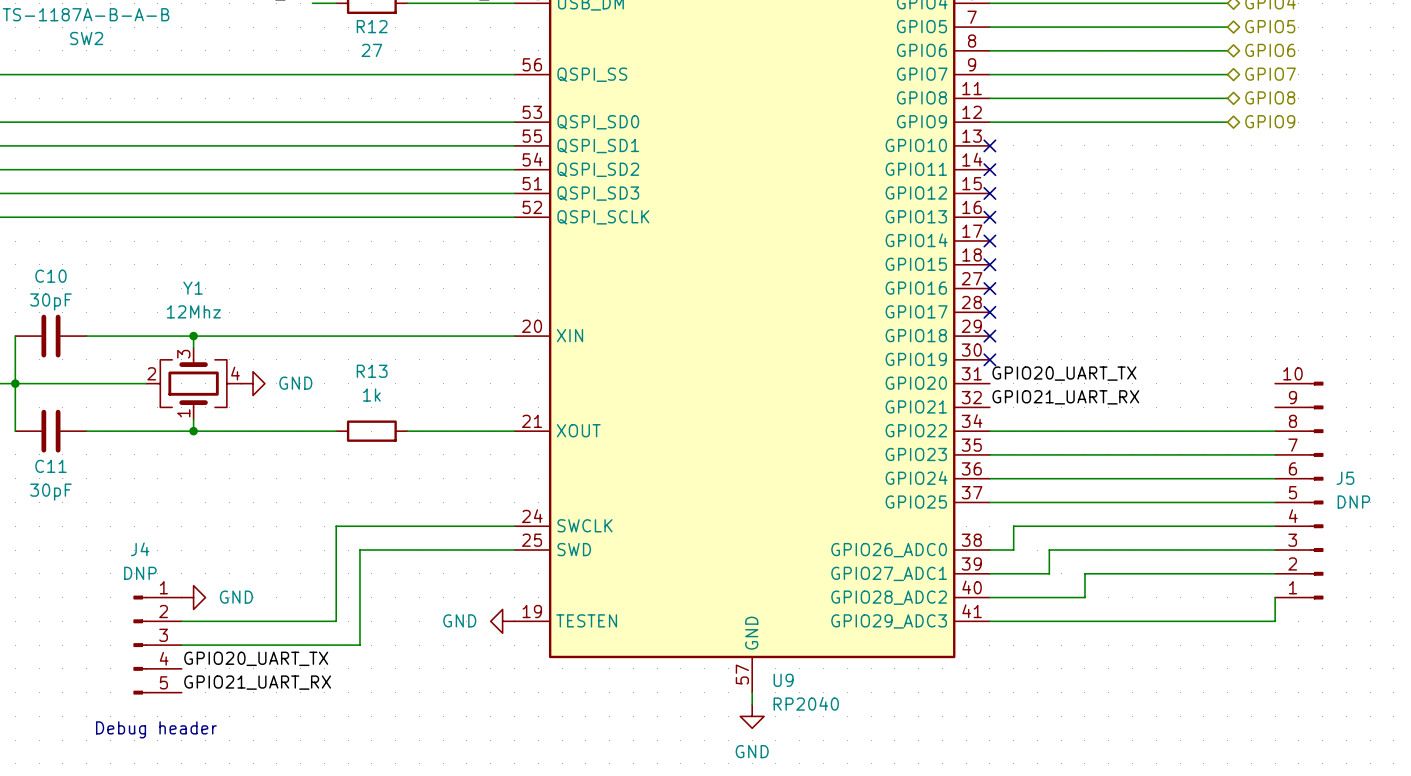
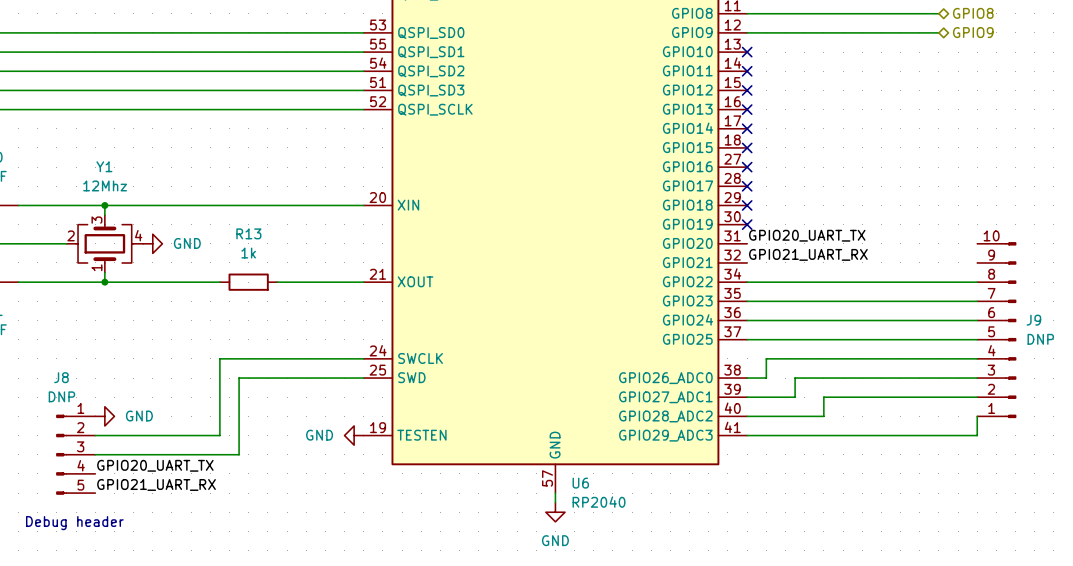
J5 name: J5 (1345, 478) -> J9 (1033, 320)
J4 name: J4 (140, 549) -> J8 (61, 377)
U9 name: U9 (783, 680) -> U6 (580, 483)

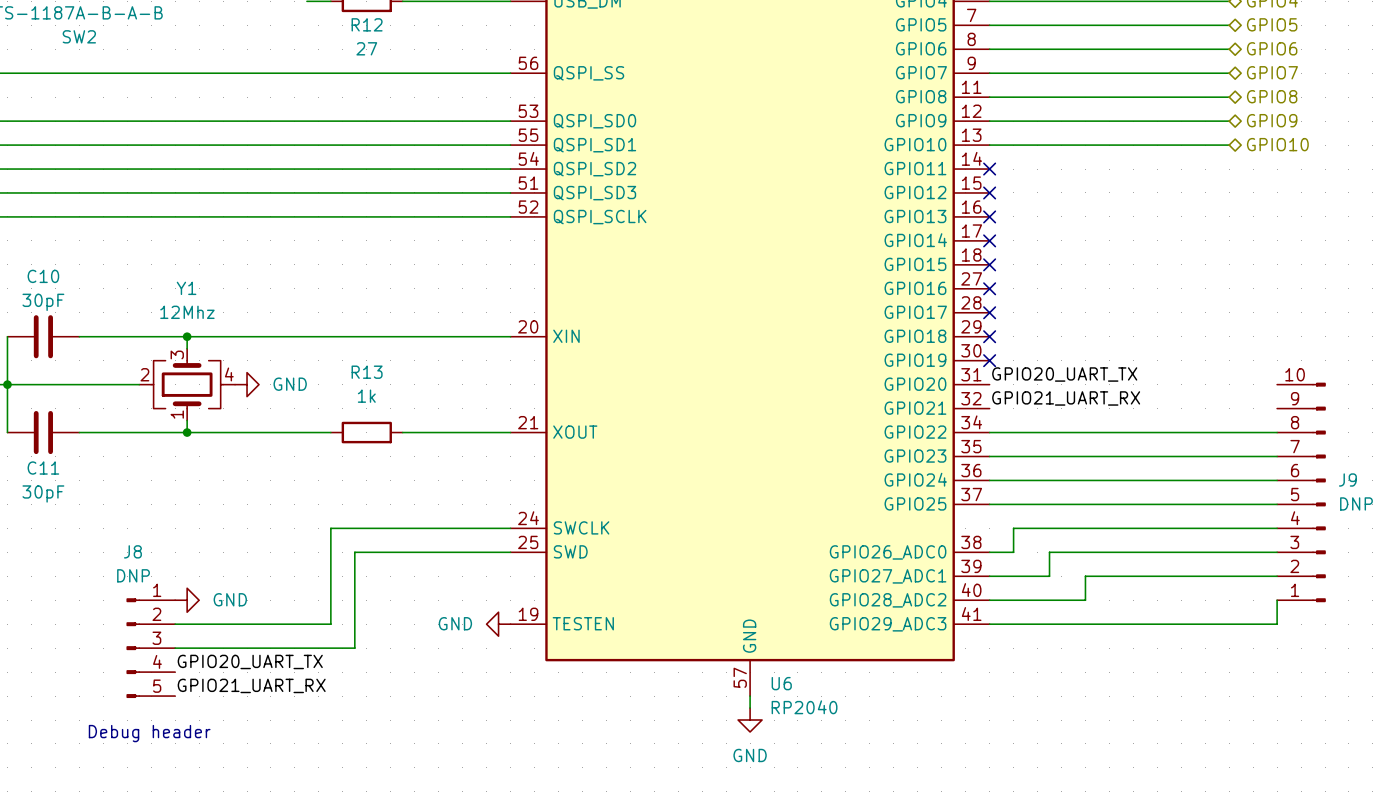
hierarchical label: none -> GPIO10 (1277, 144)
wire: none -> (989, 145) (1229, 145)
no-connect mark: (747, 52) -> none

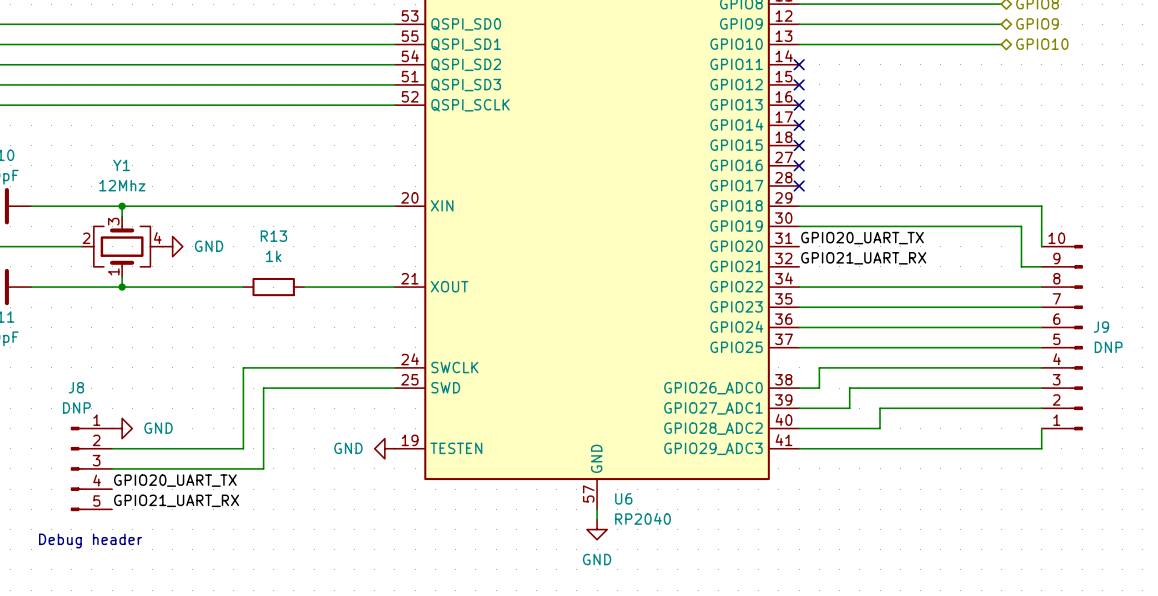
wire: none -> (799, 206) (1041, 206) (1041, 246)
no-connect mark: (989, 336) -> none
wire: none -> (799, 226) (1021, 226) (1021, 266) (1041, 266)
no-connect mark: (989, 360) -> none

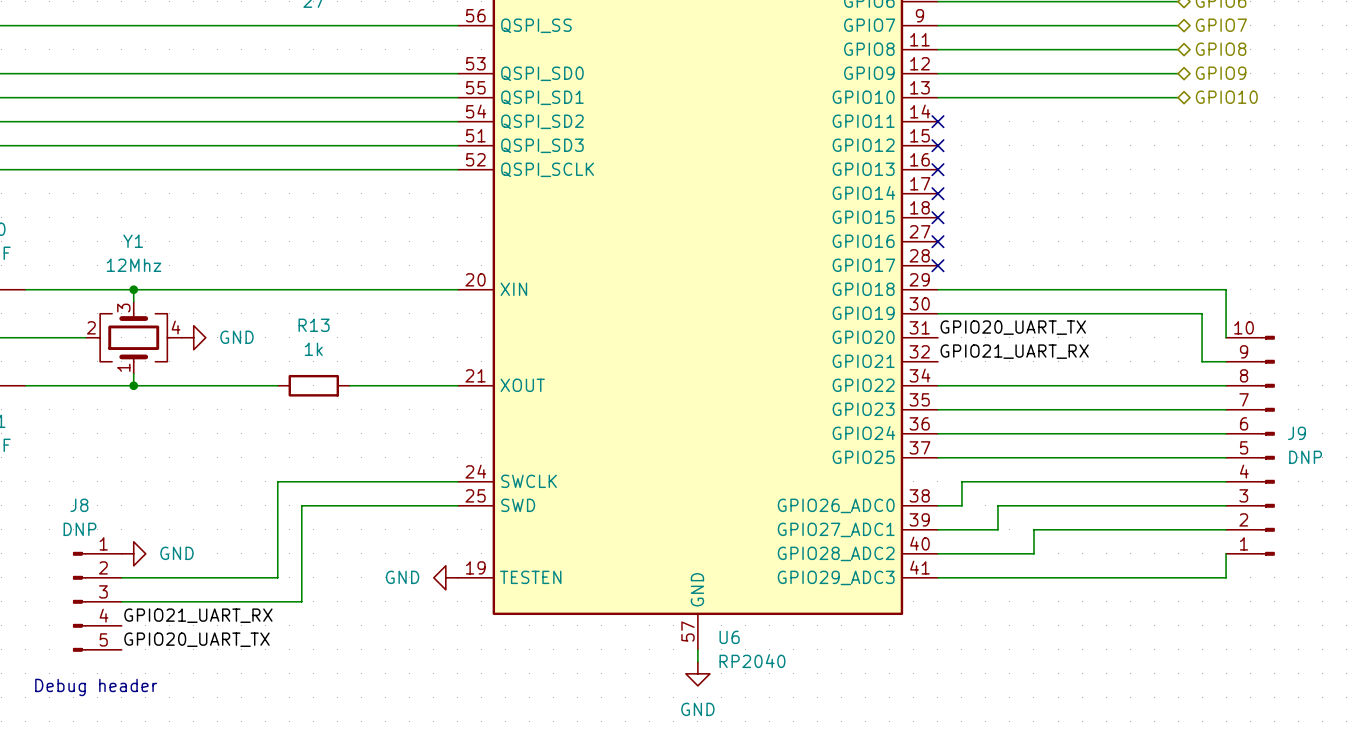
label: GPIO20_UART_TX (175, 480) -> GPIO21_UART_RX (198, 615)
label: GPIO21_UART_RX (176, 500) -> GPIO20_UART_TX (196, 639)

